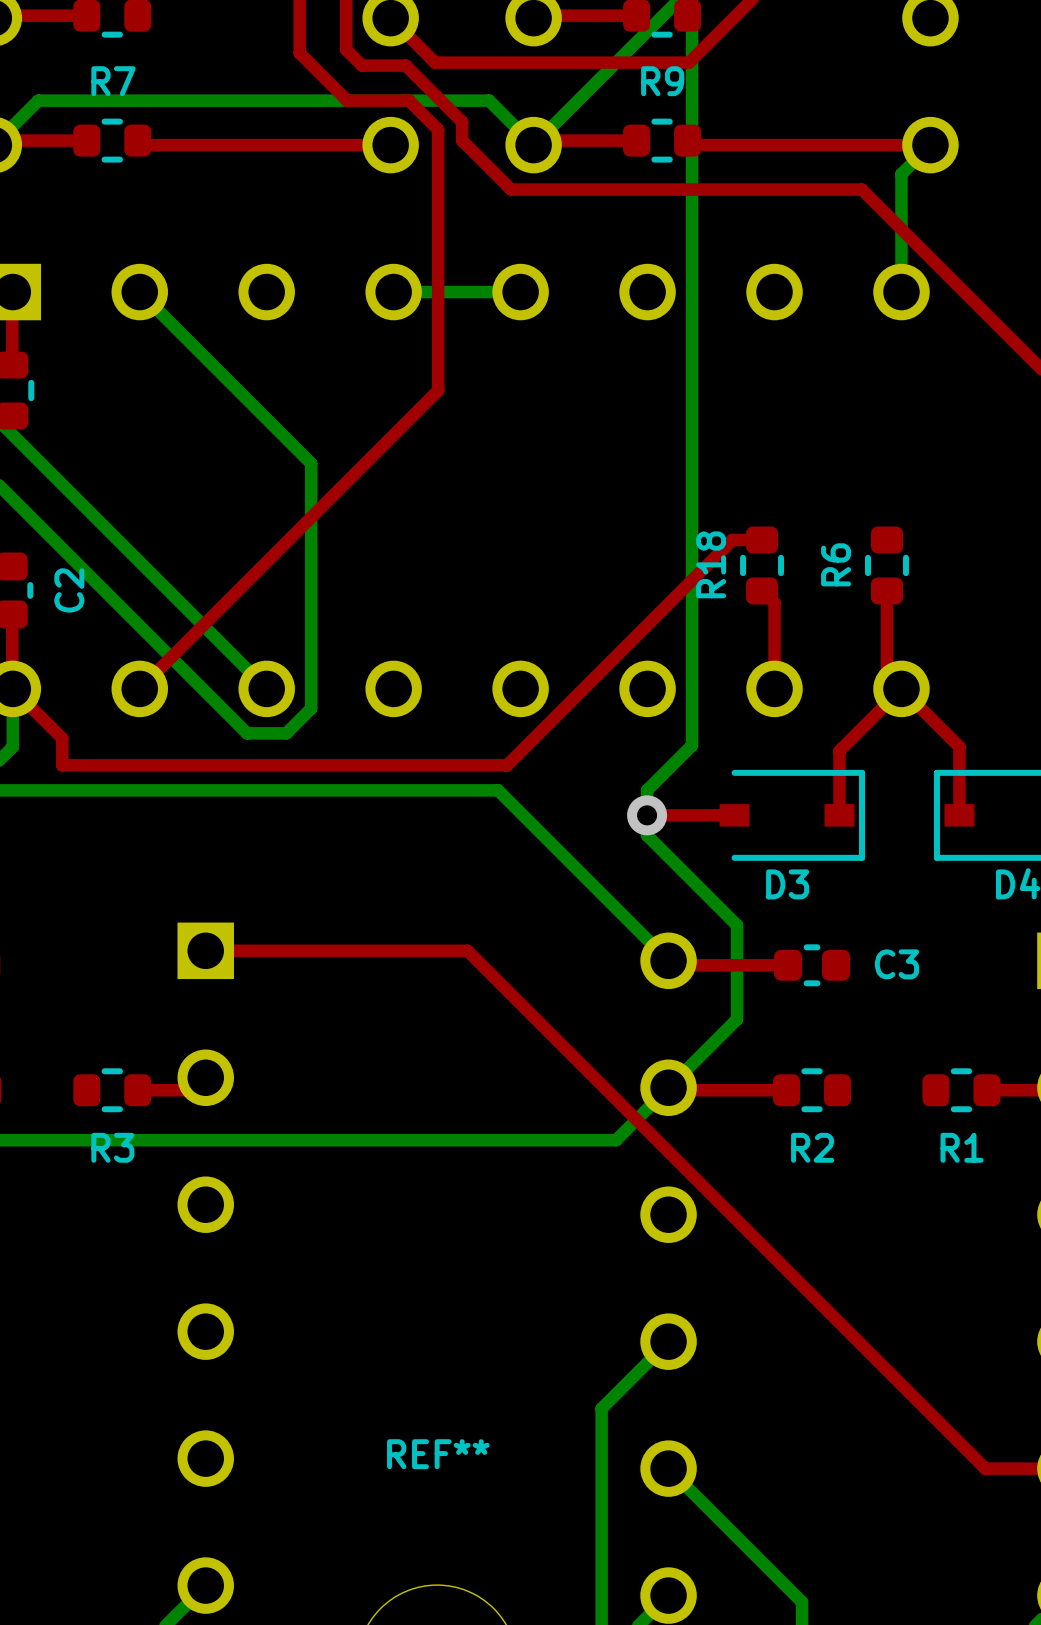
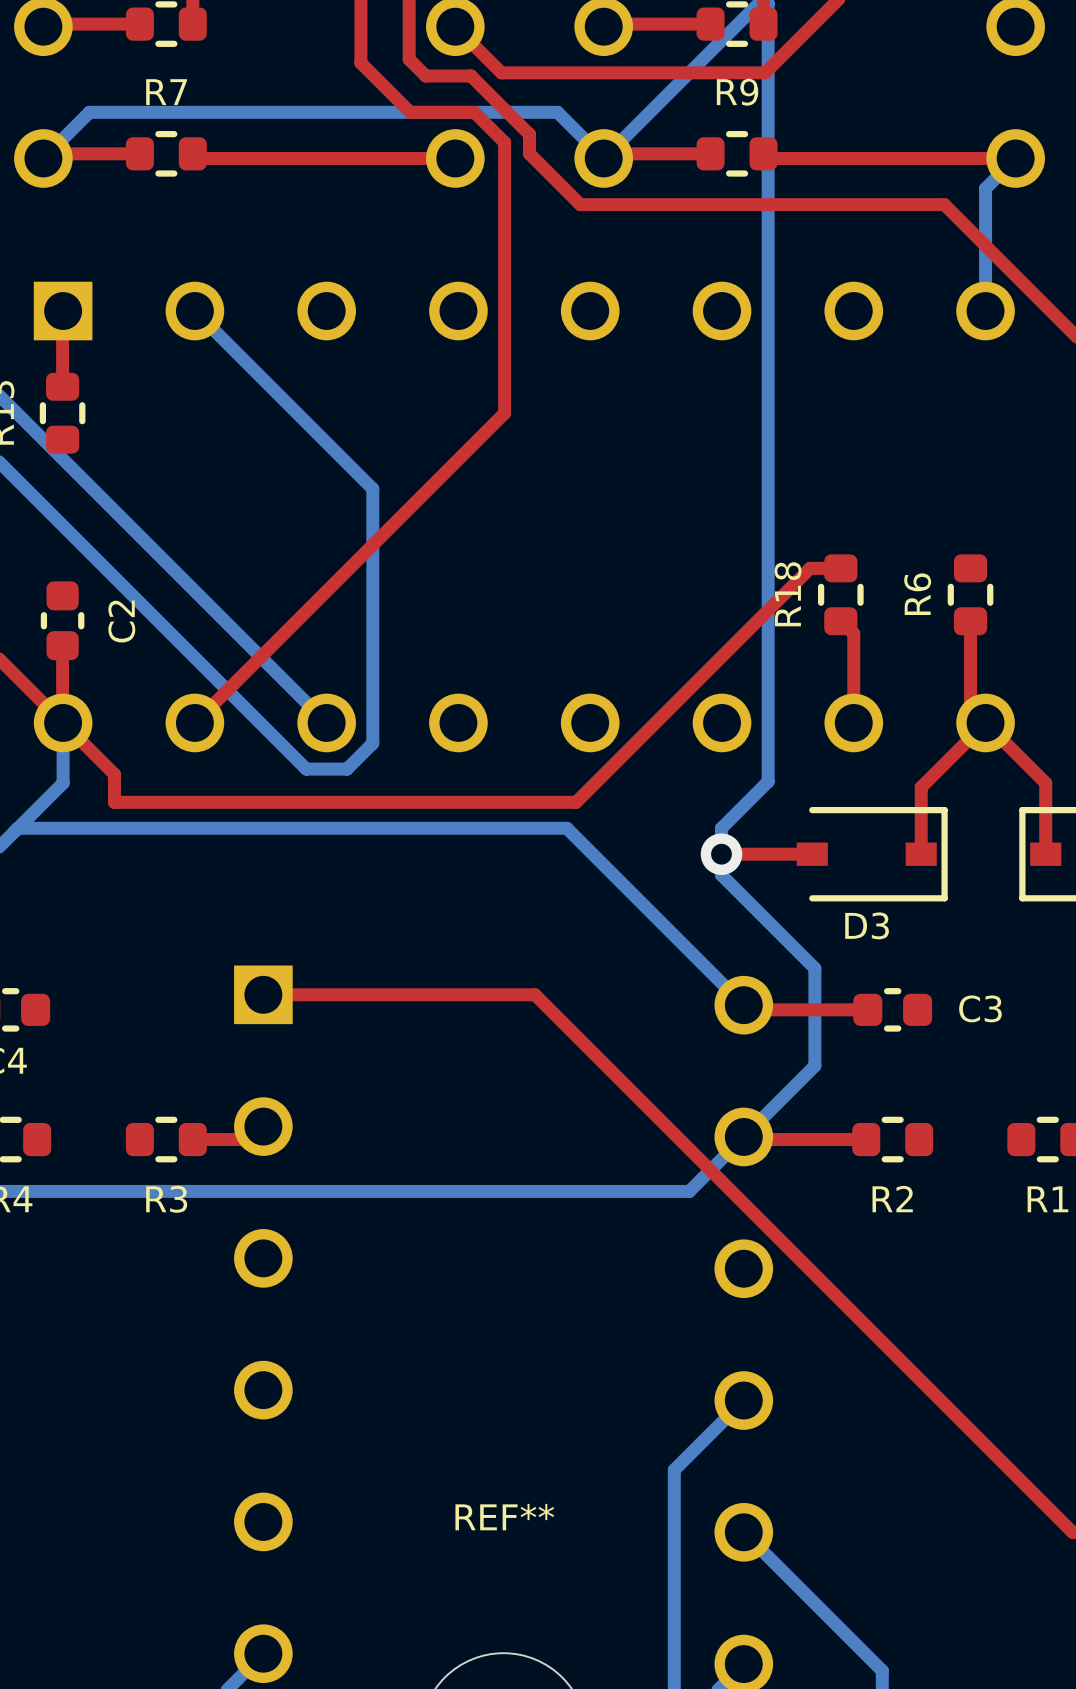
bottom track: (393, 292) (520, 292) -> none

